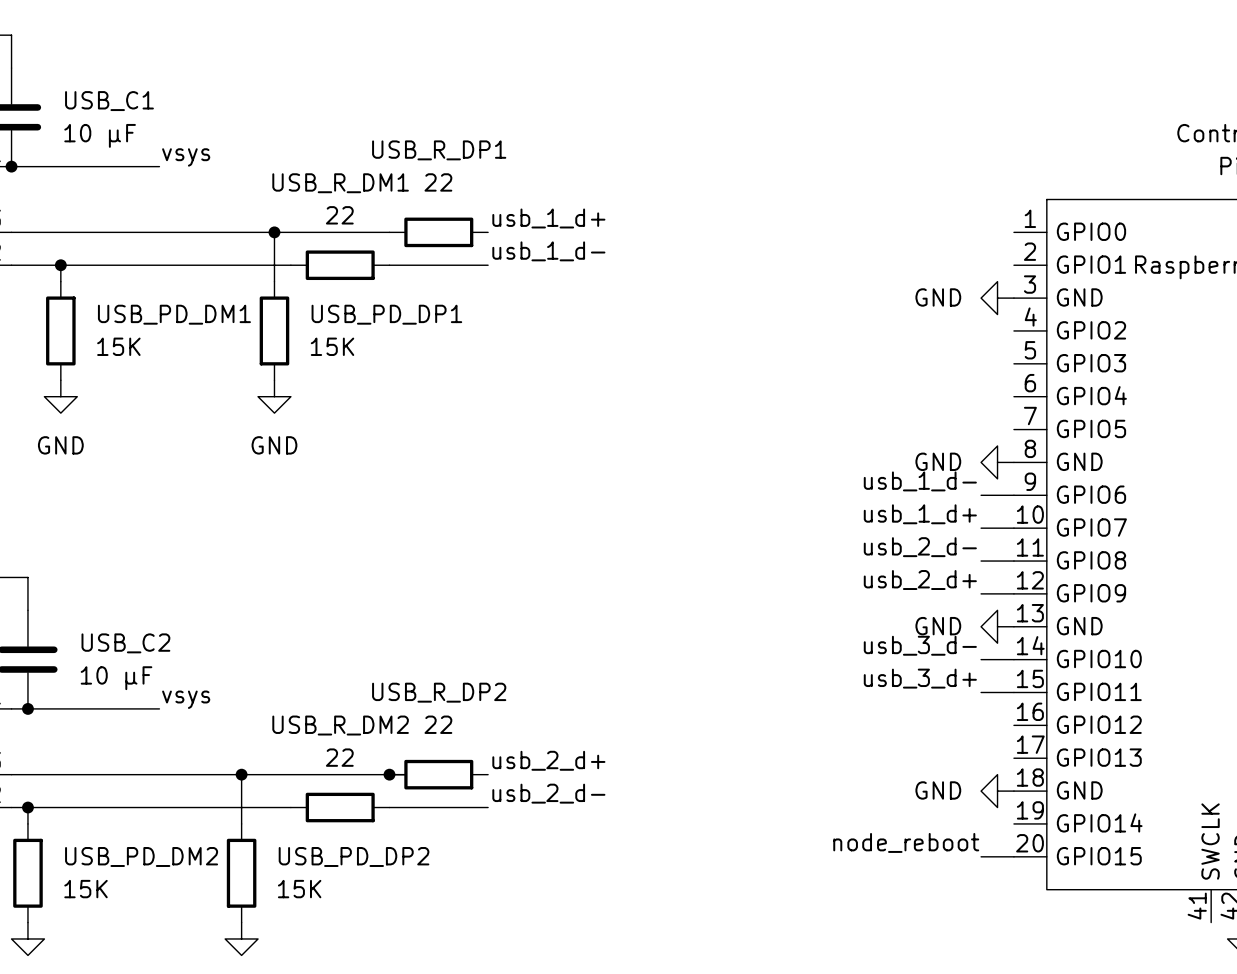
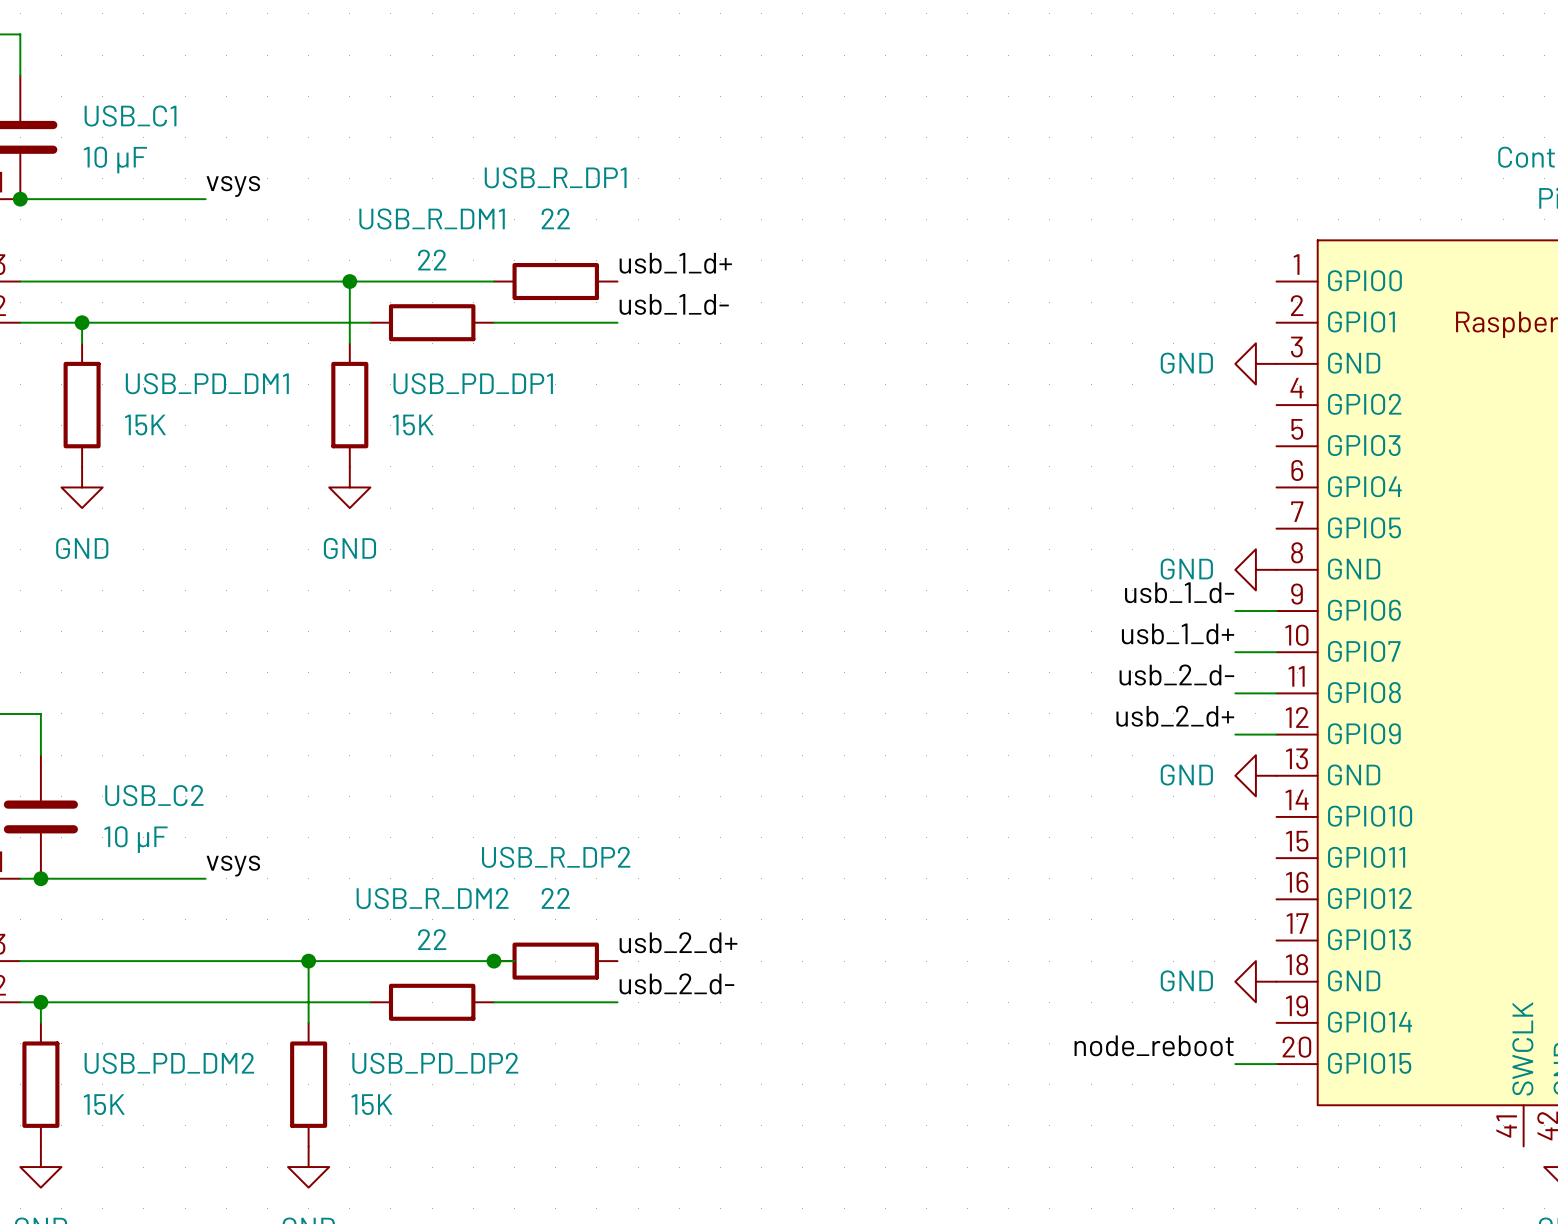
label: usb_3_d- (920, 645) -> none
wire: (981, 659) (1013, 659) -> none
label: usb_3_d+ (920, 678) -> none
wire: (981, 692) (1013, 692) -> none

